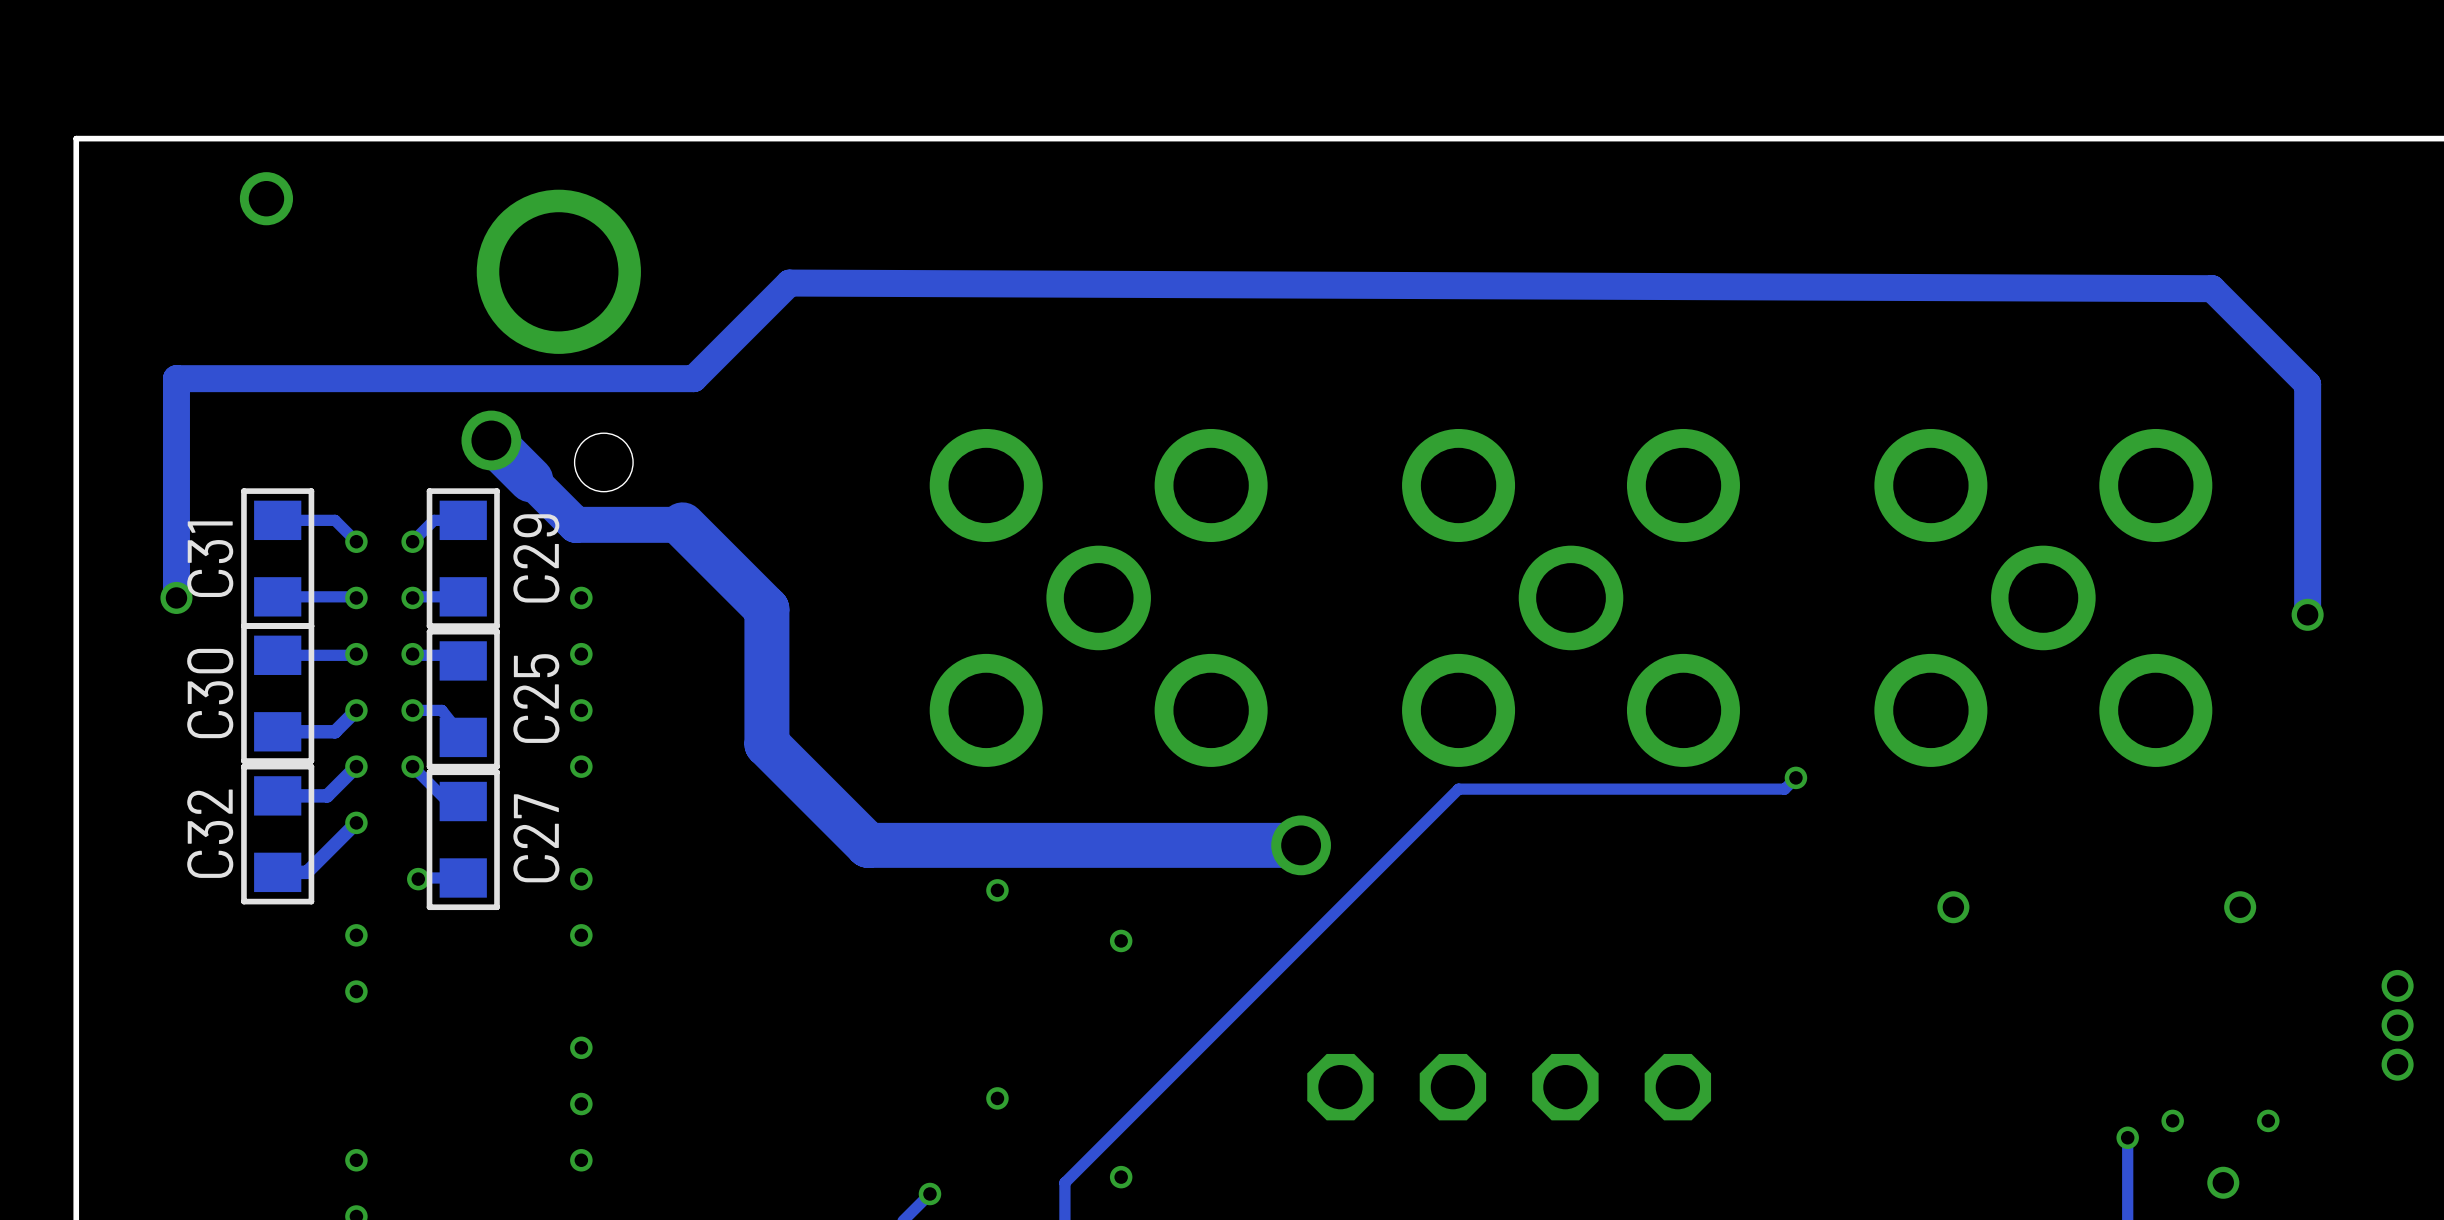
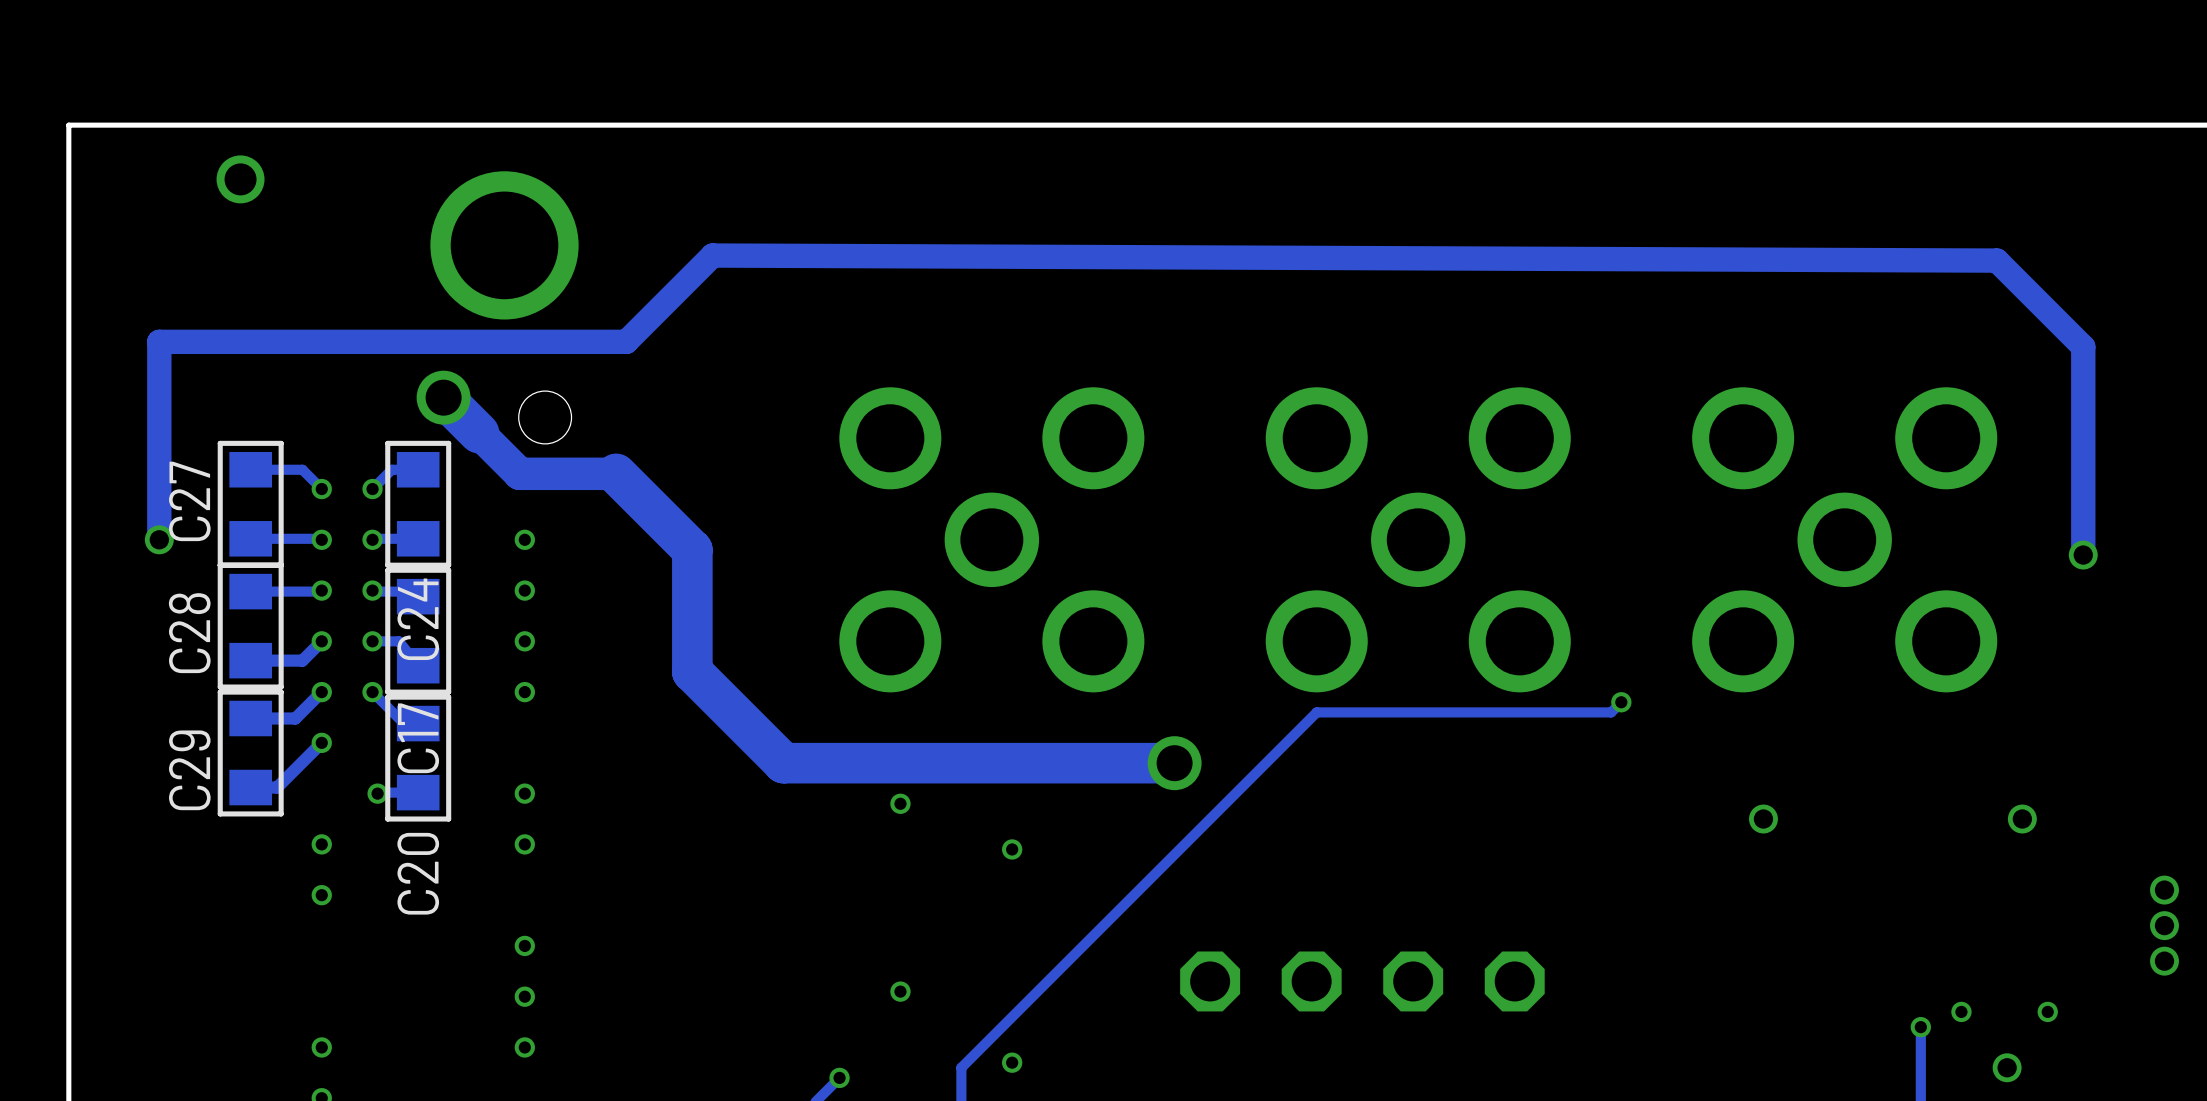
C29 name: C29 (536, 558) -> C24 (418, 619)
C31 name: C31 (210, 559) -> C27 (189, 501)
C30 name: C30 (210, 693) -> C28 (189, 633)
C25 name: C25 (536, 698) -> C17 (418, 738)
C32 name: C32 (210, 833) -> C29 (189, 770)
C27 name: C27 (536, 838) -> C20 (418, 873)

